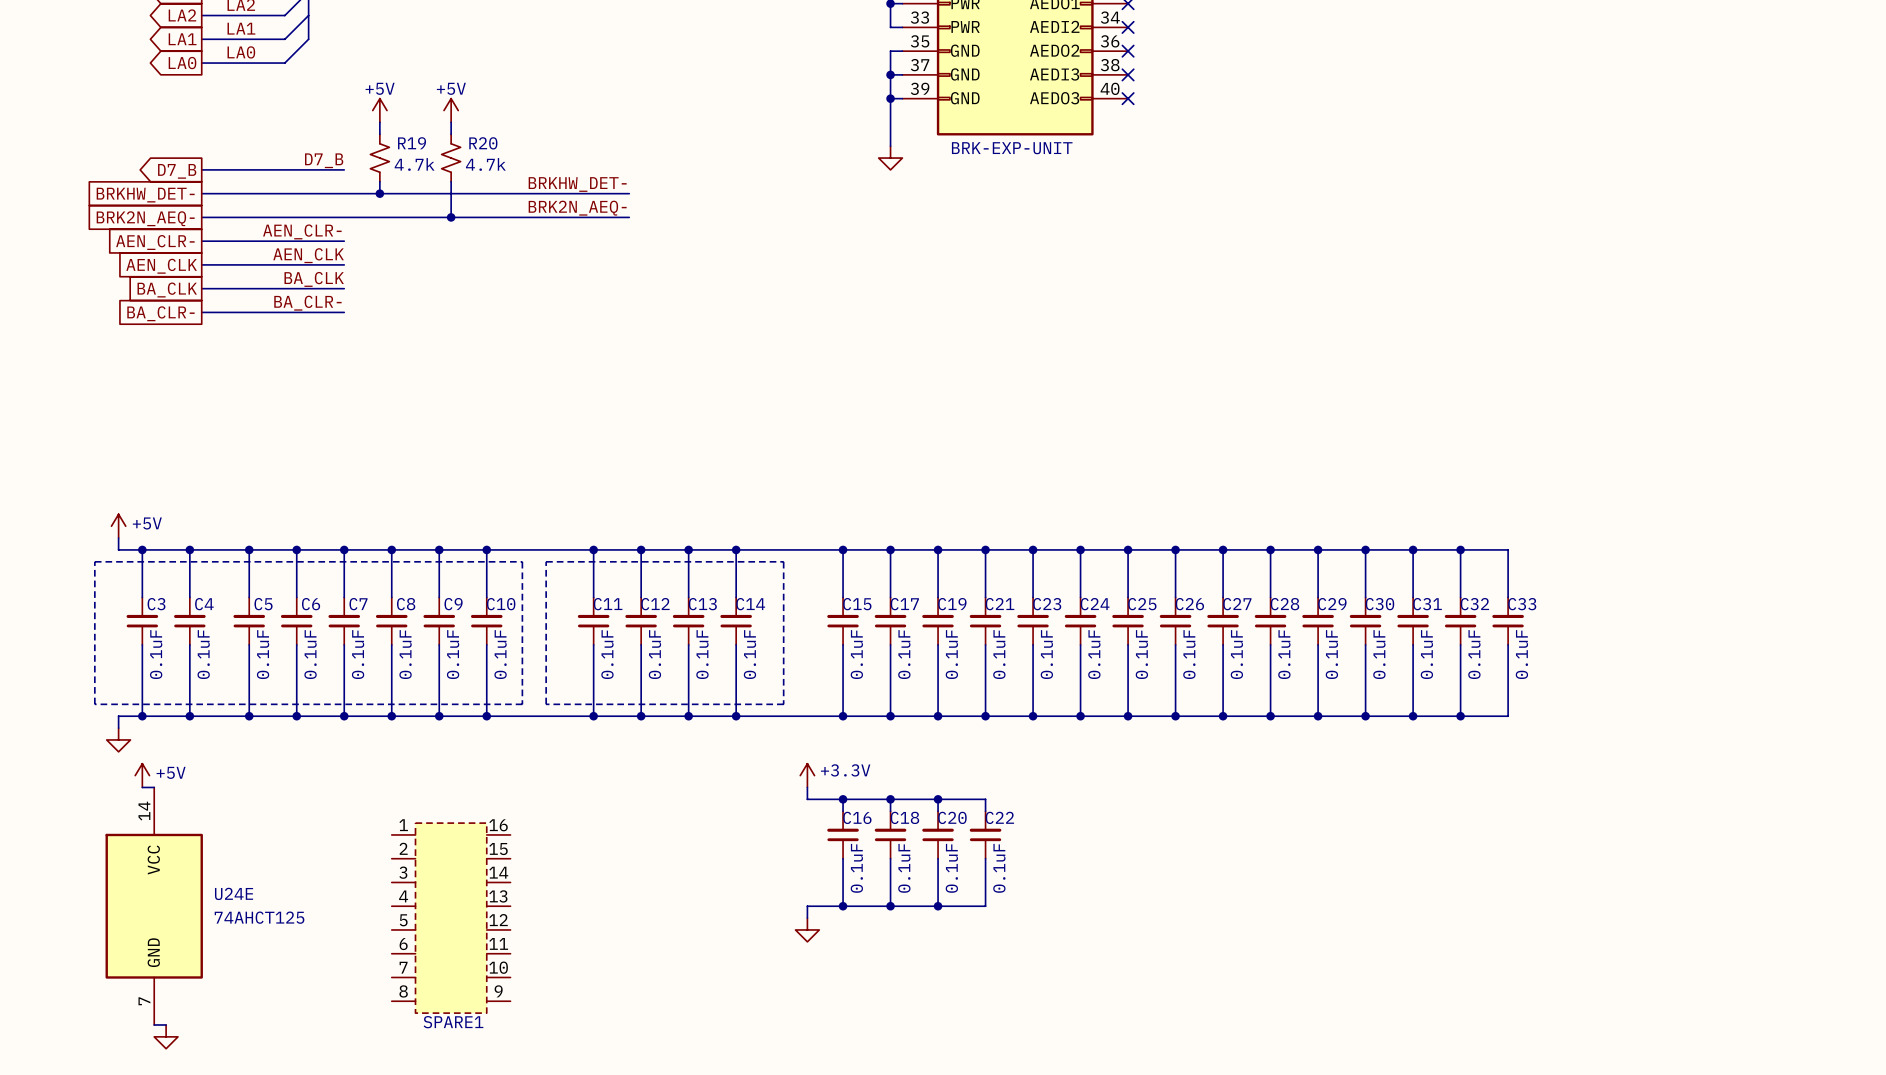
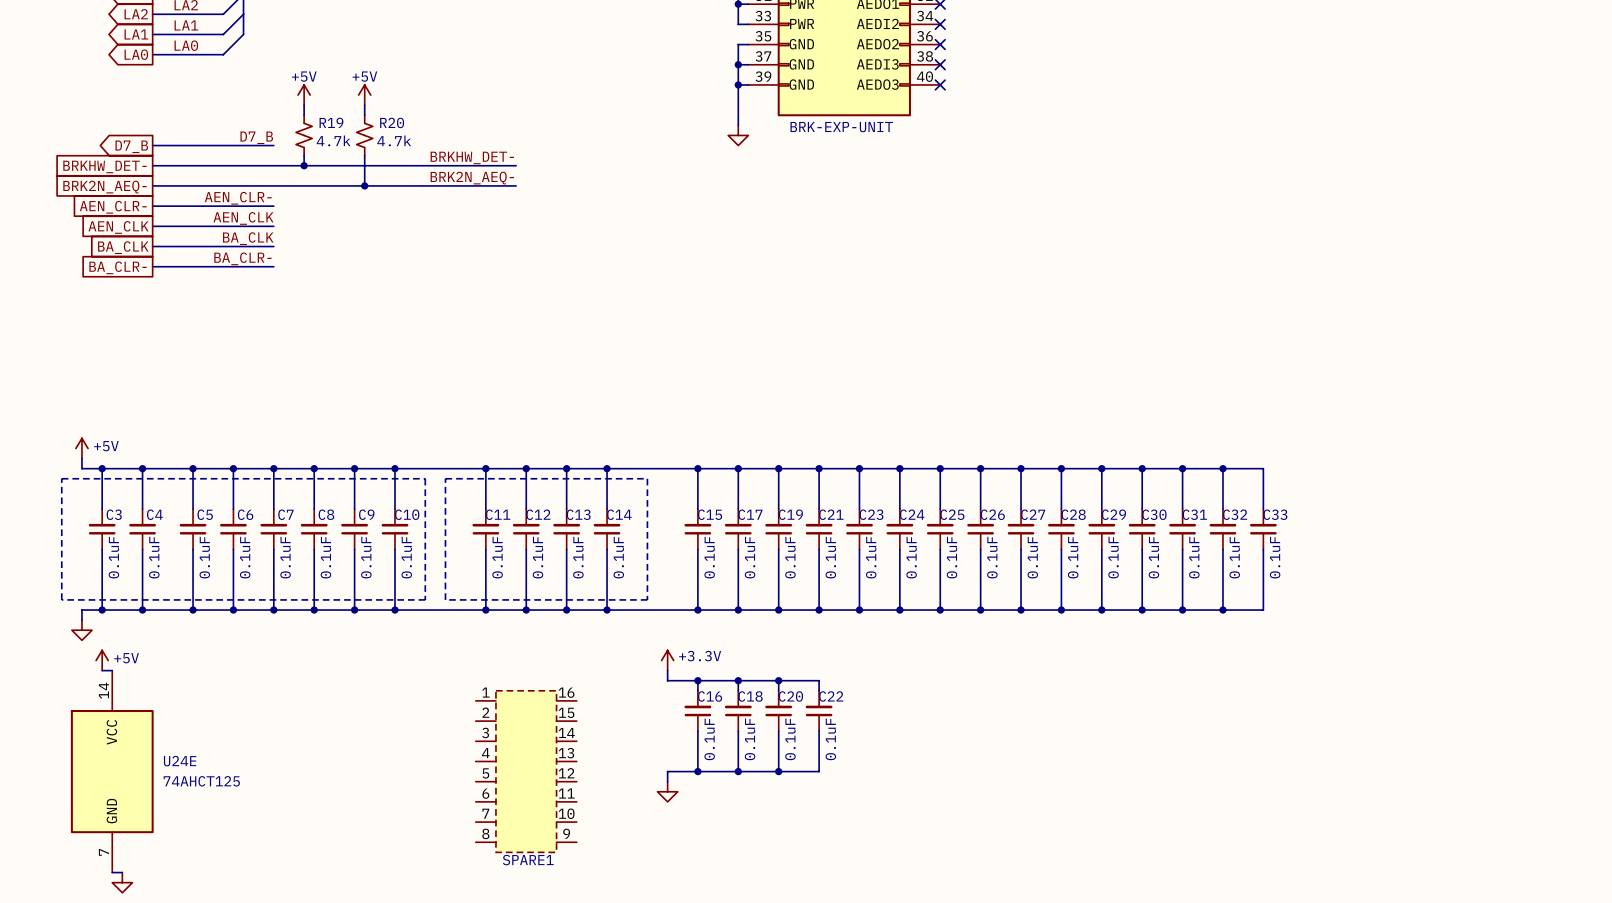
SPARE1 position: (451, 918) -> (526, 771)

